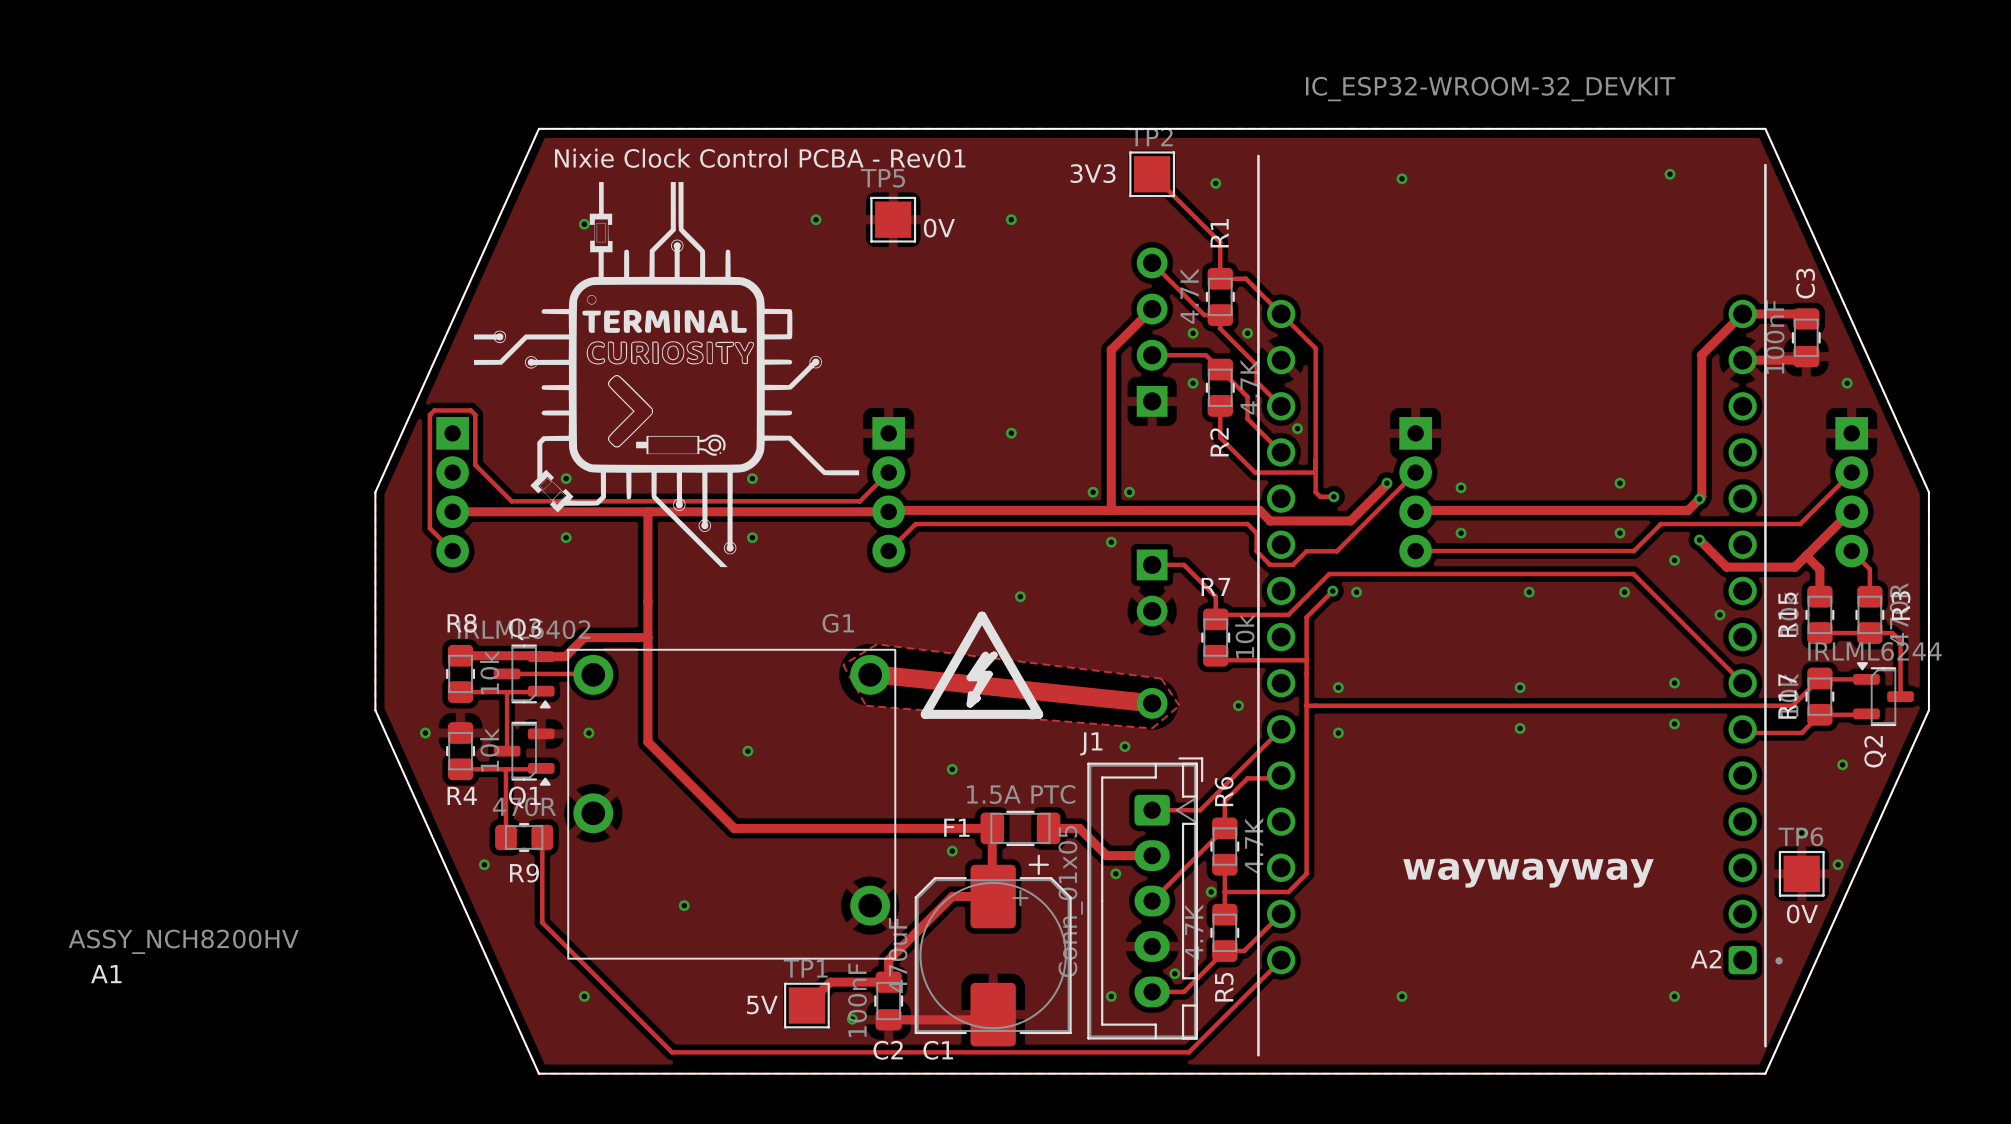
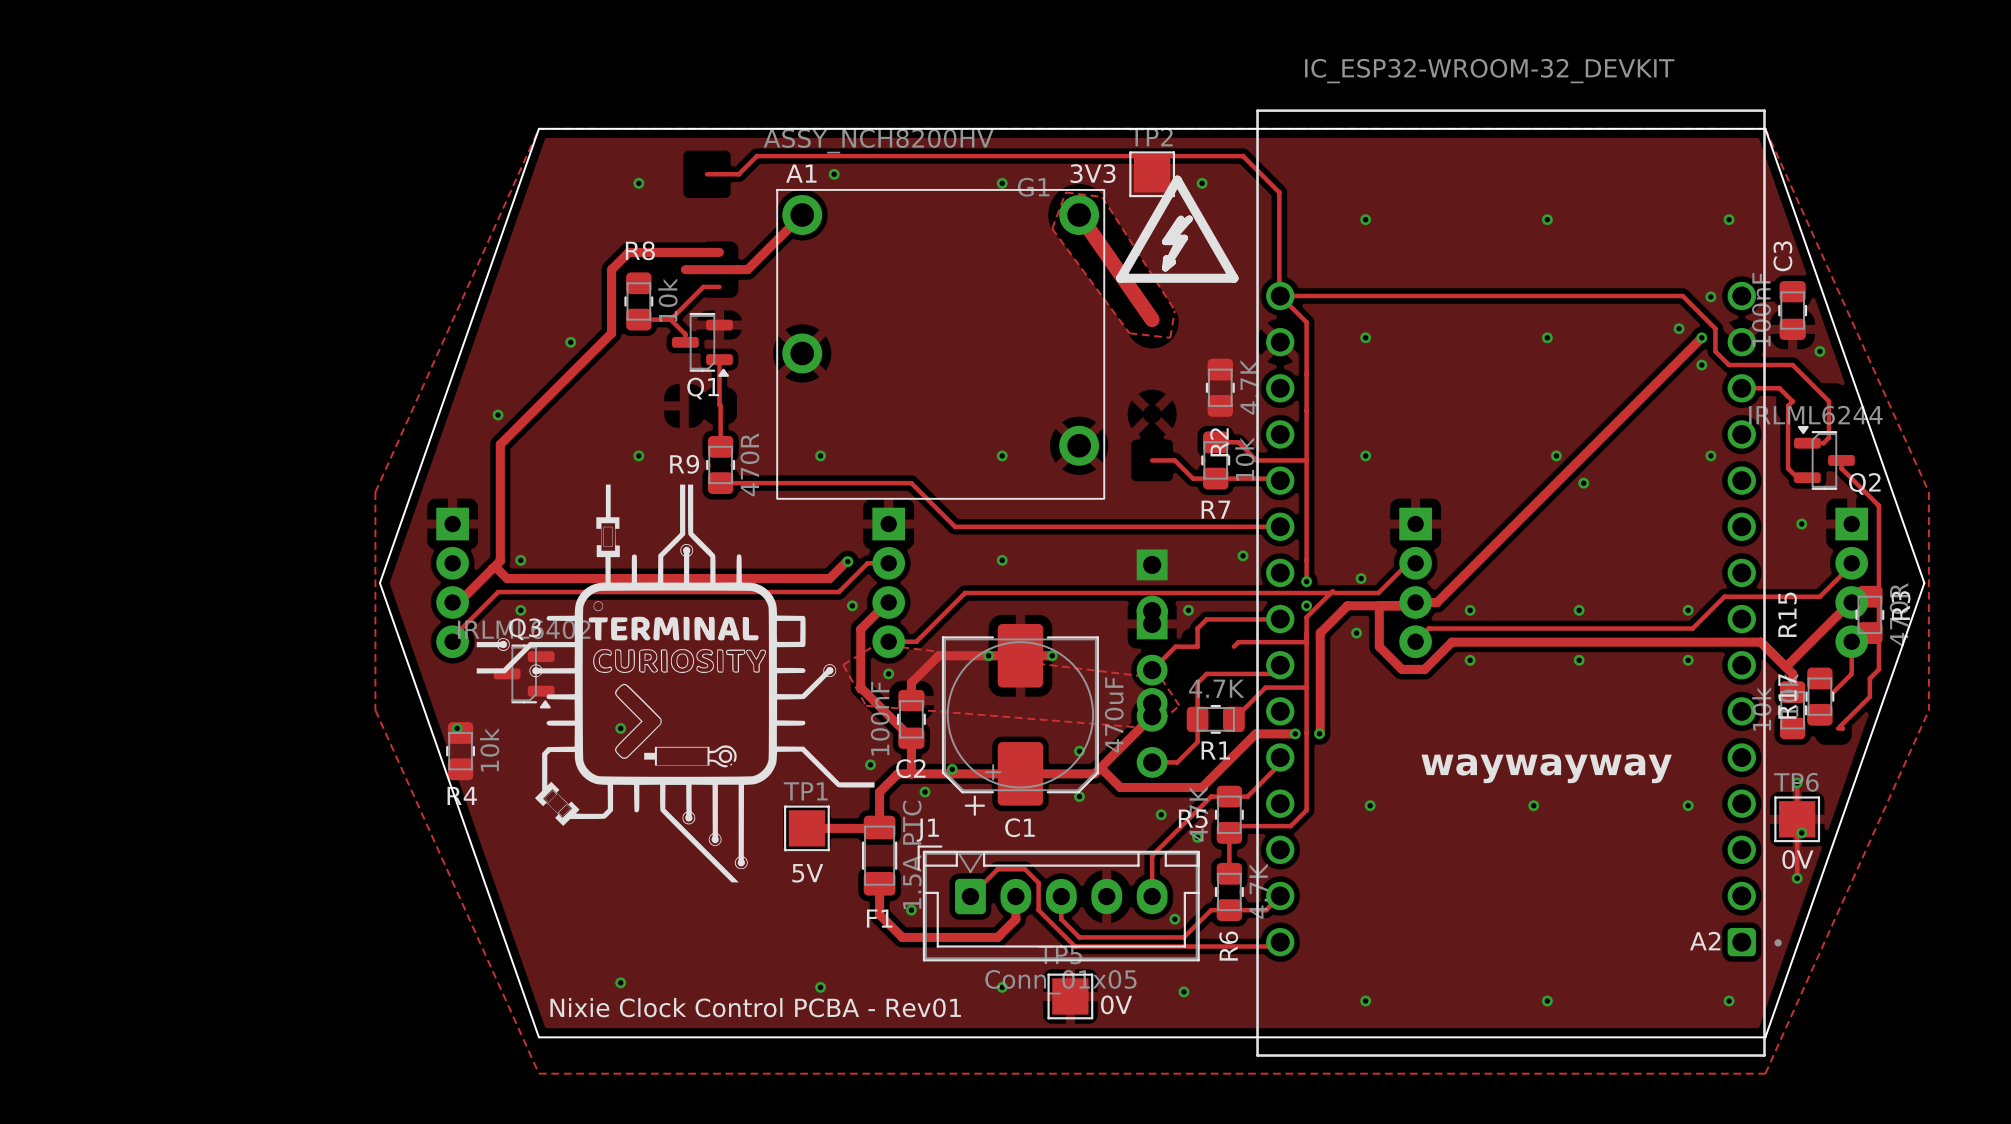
board edge: (538, 128) (375, 492) (375, 710) (538, 1073) (1765, 1073) (1928, 710) (1928, 492) (1765, 128) -> (538, 128) (379, 583) (538, 1037) (1765, 1037) (1924, 583) (1765, 128)
A2 footprint: [1257, 154, 1783, 1057] -> [1256, 109, 1782, 1057]
text: Nixie Clock Control PCBA - Rev01 (760, 158) -> none
track: none -> (706, 174) (738, 174) (756, 156) (1243, 156) (1279, 192) (1279, 295) (1306, 322) (1306, 581)
track: (1152, 174) (1220, 242) (1220, 278) (1245, 278) (1315, 348) (1315, 492) (1320, 496) (1333, 496) -> none
via: (1670, 174) -> none
via position: (1401, 178) -> (1365, 219)
drawing: [474, 182, 860, 568] -> none
via: none -> (638, 183)
via position: (1215, 183) -> (1202, 183)
zone outline: none -> (1065, 192) (1102, 196) (1174, 310) (1170, 337) (1129, 333) (1052, 228) (1065, 192)
track: none -> (802, 215) (747, 269) (685, 269)
track: none -> (1079, 215) (1152, 319)
via position: (816, 219) -> (834, 174)
TP5 position: (893, 219) -> (1070, 996)
via position: (1011, 219) -> (1002, 183)
via: none -> (1547, 219)
via: none -> (1729, 219)
via: (584, 224) -> none
R1 name position: R1 (1219, 233) -> R1 (1215, 750)
track: none -> (719, 252) (628, 252) (611, 269) (611, 333) (500, 444) (500, 560) (458, 602) (452, 602)
track: (1152, 262) (1204, 315) (1220, 315) (1220, 328) (1256, 365) (1256, 381) (1281, 406) -> none
C3 name position: C3 (1805, 283) -> C3 (1782, 256)
track: none -> (719, 286) (703, 286) (670, 319)
R1 rotation: 0° (1220, 296) -> 90° clockwise (1215, 719)
R1 position: (1220, 296) -> (1215, 719)
track: none -> (1280, 296) (1682, 296) (1715, 328) (1715, 351) (1729, 365) (1792, 365) (1828, 401) (1828, 437) (1823, 443) (1807, 443)
via: none -> (1710, 296)
track: (1152, 309) (1111, 349) (1111, 510) -> none
track: (1801, 318) (1796, 313) (1742, 313) (1701, 354) (1701, 496) (1688, 510) (1417, 510) (1412, 514) -> none
track: none -> (638, 319) (670, 319)
track: none -> (670, 319) (685, 334) (685, 342)
via: none -> (1679, 328)
part rotation: 0° (1152, 332) -> 180° (1152, 693)
part position: (1152, 332) -> (1152, 693)
via: (1193, 333) -> none
via: (1247, 333) -> none
via: none -> (1365, 337)
via: none -> (1547, 337)
track: none -> (1701, 337) (1437, 602) (1415, 602) (1412, 605) (1347, 605) (1320, 633) (1319, 733)
via: none -> (1701, 337)
C3 position: (1806, 337) -> (1792, 310)
via: none -> (570, 342)
track: (1152, 355) (1205, 355) (1247, 396) (1247, 418) (1281, 452) -> none
track: (1806, 356) (1802, 360) (1742, 360) -> none
track: none -> (719, 359) (720, 446)
via: none -> (1701, 365)
via: (1193, 383) -> none
via position: (1847, 383) -> (1819, 351)
track: none -> (1741, 388) (1779, 388) (1792, 401) (1788, 405) (1788, 468) (1797, 477) (1807, 477)
track: (1220, 405) (1220, 437) (1255, 472) (1315, 472) -> none
via: none -> (498, 415)
via: (1297, 428) -> none
via position: (1011, 433) -> (1002, 455)
track: none -> (1215, 442) (1238, 442) (1256, 460) (1306, 460)
via: none -> (638, 455)
via: none -> (820, 455)
via: none -> (1365, 455)
via: none -> (1556, 455)
via: none -> (1710, 455)
track: none -> (1152, 460) (1174, 460) (1193, 478) (1278, 478) (1280, 480)
track: none -> (1841, 460) (1841, 468) (1878, 505) (1878, 669) (1869, 678) (1869, 696) (1840, 726) (1842, 728) (1838, 728)
track: (888, 472) (859, 501) (511, 501) (475, 464) (475, 415) (470, 410) (434, 410) (429, 415) (429, 528) (452, 551) -> none
track: (1415, 472) (1336, 551) (1306, 551) (1292, 564) (1270, 564) (1256, 551) (1256, 533) (1247, 524) (915, 524) (888, 551) -> none
track: (1851, 472) (1800, 524) (1660, 524) (1633, 551) (1415, 551) -> none
via: (566, 478) -> none
via: (752, 478) -> none
track: (1386, 483) (1350, 520) (1270, 520) (1259, 510) (890, 510) -> none
via: (1386, 483) -> none
via: none -> (1583, 483)
via: (1620, 483) -> none
drawing: none -> [476, 484, 875, 883]
track: none -> (725, 487) (720, 483) (911, 483) (955, 526) (1280, 526)
via: (1461, 487) -> none
part position: (452, 492) -> (452, 582)
part position: (888, 492) -> (888, 582)
via: (1093, 492) -> none
via: (1129, 492) -> none
part position: (1415, 492) -> (1415, 582)
part position: (1851, 492) -> (1851, 582)
via: (1333, 496) -> none
via: (1699, 499) -> none
track: (890, 510) (452, 511) -> none
track: (647, 511) (647, 742) (734, 828) (806, 828) -> none
track: (1851, 511) (1794, 567) (1726, 567) (1699, 539) -> none
via: none -> (1801, 524)
via: (1461, 533) -> none
via: (1620, 533) -> none
via: (566, 537) -> none
via: (752, 537) -> none
via: (1699, 539) -> none
via: (1111, 542) -> none
track: (1851, 551) (1869, 569) (1869, 596) -> none
via: none -> (1243, 555)
track: (1806, 555) (1819, 569) (1819, 596) -> none
via: none -> (520, 560)
via: none -> (1002, 560)
via: (1674, 560) -> none
track: none -> (847, 561) (829, 578) (507, 578) (497, 568) (492, 568)
via: none -> (847, 561)
track: (1152, 564) (1183, 564) (1215, 596) (1215, 614) (1288, 614) (1329, 574) (1633, 574) (1742, 683) -> none
track: none -> (888, 571) (880, 563) (867, 563) (838, 592) (498, 592) (452, 637) (452, 641)
track: none -> (1415, 571) (1407, 563) (1378, 593) (965, 593) (916, 641) (888, 641)
track: none -> (1851, 571) (1844, 571) (1819, 596) (1724, 596) (1692, 628) (1428, 628) (1415, 641)
via: none -> (1306, 581)
R7 name position: R7 (1215, 586) -> R7 (1215, 509)
via: (1332, 591) -> none
via position: (1356, 592) -> (1361, 578)
via: (1529, 592) -> none
via: (1624, 592) -> none
track: none -> (1851, 594) (1851, 601) (1785, 667)
via: (1020, 596) -> none
track: none -> (888, 602) (860, 629) (860, 687) (913, 740)
via: none -> (852, 605)
via: none -> (1306, 605)
track: none -> (1379, 605) (1379, 646) (1401, 669) (1424, 669) (1451, 642) (1760, 642) (1792, 673) (1792, 692)
via: none -> (520, 610)
via: none -> (1188, 610)
via: none -> (1470, 610)
via: none -> (1579, 610)
via: none -> (1688, 610)
via: (1719, 614) -> none
R15 position: (1819, 614) -> (1792, 710)
track: none -> (1280, 619) (1206, 619) (1197, 628) (1197, 646) (1175, 646) (1152, 670)
via: none -> (1356, 633)
track: (1819, 633) (1892, 633) (1900, 641) (1900, 696) -> none
track: (647, 637) (584, 637) (565, 656) (460, 655) -> none
R7 position: (1215, 637) -> (1215, 460)
track: none -> (1851, 641) (1851, 673) (1833, 692)
track: none -> (1306, 642) (1238, 642) (1233, 646)
track: (1215, 651) (1224, 660) (1306, 660) -> none
via: none -> (988, 655)
track: none -> (1052, 655) (938, 655) (911, 683) (911, 700)
via: none -> (1052, 655)
via: none -> (1470, 660)
via: none -> (1579, 660)
G1 position: (981, 665) -> (1177, 229)
track: none -> (1280, 665) (1271, 673) (1206, 673) (1197, 683) (1197, 742) (1177, 762) (1152, 762)
R8 position: (460, 673) -> (638, 301)
track: (507, 673) (593, 674) -> none
track: (870, 673) (1152, 703) -> none
via: none -> (888, 673)
track: (1866, 679) (1819, 678) (1792, 705) (1306, 705) -> none
via position: (1674, 683) -> (1688, 660)
track: none -> (1306, 687) (1265, 687) (1233, 719)
via: (1338, 687) -> none
via: (1520, 687) -> none
track: (541, 691) (460, 692) -> none
track: (507, 692) (507, 746) -> none
Q2 position: (1883, 694) -> (1824, 457)
via: (1238, 705) -> none
track: (1866, 713) (1819, 714) (1801, 732) (1746, 732) (1742, 729) -> none
via: (1674, 723) -> none
via: (1520, 728) -> none
track: (1281, 729) (1200, 810) (1152, 810) -> none
via position: (425, 732) -> (457, 728)
via position: (588, 732) -> (620, 728)
via position: (1338, 732) -> (1319, 733)
track: none -> (1295, 733) (1255, 733) (1202, 787) (1120, 787) (1100, 767)
via: none -> (1295, 733)
track: none -> (911, 738) (911, 773)
J1 name position: J1 (1091, 743) -> J1 (927, 830)
via: (1124, 746) -> none
via: (747, 751) -> none
via: none -> (1079, 751)
Q2 name rotation: 0° (1875, 751) -> 90° clockwise (1864, 483)
Q2 name position: Q2 (1875, 751) -> Q2 (1864, 483)
Q1 position: (524, 753) -> (702, 344)
track: none -> (1280, 757) (1277, 760) (1277, 766) (1247, 796) (1211, 796) (1152, 855) (1152, 896)
via: none -> (870, 764)
via: (1842, 764) -> none
track: (460, 769) (535, 769) -> none
track: (507, 769) (505, 837) -> none
track: (1281, 775) (1278, 778) (1247, 778) (1224, 801) (1224, 828) (1152, 901) (1152, 898) -> none
track: none -> (1797, 782) (1797, 878)
via: none -> (1797, 782)
R6 name position: R6 (1224, 791) -> R6 (1228, 946)
via: none -> (925, 792)
via: none -> (1079, 796)
A1 position: (731, 804) -> (940, 344)
via: none -> (1370, 805)
via: none -> (1533, 805)
via: none -> (1688, 805)
track: (1306, 810) (1306, 873) (1288, 891) (1224, 891) -> (1306, 810) (1290, 826) (1236, 826) (1229, 832) (1229, 873)
via: none -> (1161, 814)
F1 name position: F1 (956, 827) -> F1 (879, 918)
track: (878, 828) (992, 828) (993, 896) (952, 896) (888, 960) (888, 982) (830, 982) (806, 1005) -> (878, 828) (879, 792) (897, 773) (1094, 773) (1152, 716)
F1 rotation: 0° (1020, 828) -> 90° clockwise (879, 855)
F1 position: (1020, 828) -> (879, 855)
track: (1048, 828) (1079, 828) (1106, 855) (1152, 855) -> none
R9 rotation: 0° (524, 837) -> 90° clockwise (720, 464)
R9 position: (524, 837) -> (720, 464)
track: (542, 837) (542, 922) (672, 1052) (1188, 1052) (1281, 960) -> none
via: none -> (1197, 837)
R6 position: (1224, 846) -> (1229, 891)
via: (952, 851) -> none
via: (484, 864) -> none
track: (1224, 864) (1224, 910) -> none
via position: (1838, 864) -> (1797, 878)
via: (1115, 873) -> none
text position: waywayway (1528, 873) -> waywayway (1546, 768)
TP6 position: (1801, 873) -> (1797, 819)
track: none -> (879, 883) (879, 914) (902, 937) (997, 937) (1015, 919) (1015, 896)
via: (1211, 891) -> none
track: none -> (1280, 895) (1266, 910) (1211, 910) (1183, 937) (1079, 937) (1061, 919) (1061, 896)
track: none -> (970, 896) (997, 869) (1024, 869) (1038, 882) (1038, 910) (1074, 946) (1275, 946) (1280, 942)
J1 rotation: 0° (1145, 898) -> 90° counterclockwise (1058, 903)
via: (684, 905) -> none
via: none -> (911, 910)
track: (1281, 913) (1244, 951) (1224, 951) (1183, 991) (1152, 991) -> none
via: none -> (1174, 919)
R5 position: (1224, 932) -> (1229, 814)
A1 value position: ASSY_NCH8200HV (183, 941) -> ASSY_NCH8200HV (878, 141)
C1 rotation: 0° (993, 950) -> 180° (1020, 719)
C1 position: (993, 950) -> (1020, 719)
via position: (1174, 973) -> (1183, 991)
A1 name position: A1 (106, 974) -> A1 (801, 173)
via: none -> (1002, 987)
R5 name rotation: 0° (1224, 987) -> 90° clockwise (1193, 818)
R5 name position: R5 (1224, 987) -> R5 (1193, 818)
via position: (584, 996) -> (620, 982)
via: (1111, 996) -> none
via position: (1401, 996) -> (1365, 1001)
via position: (1674, 996) -> (1729, 1001)
C2 position: (888, 1001) -> (911, 719)
via: none -> (1547, 1001)
TP1 value position: 5V (762, 1005) -> 5V (807, 873)
TP1 position: (806, 1005) -> (806, 828)
text: none -> Nixie Clock Control PCBA - Rev01 (755, 1007)
track: (993, 1014) (987, 1019) (888, 1019) -> none
via position: (852, 1019) -> (820, 987)
C1 name position: C1 (938, 1050) -> C1 (1019, 827)

